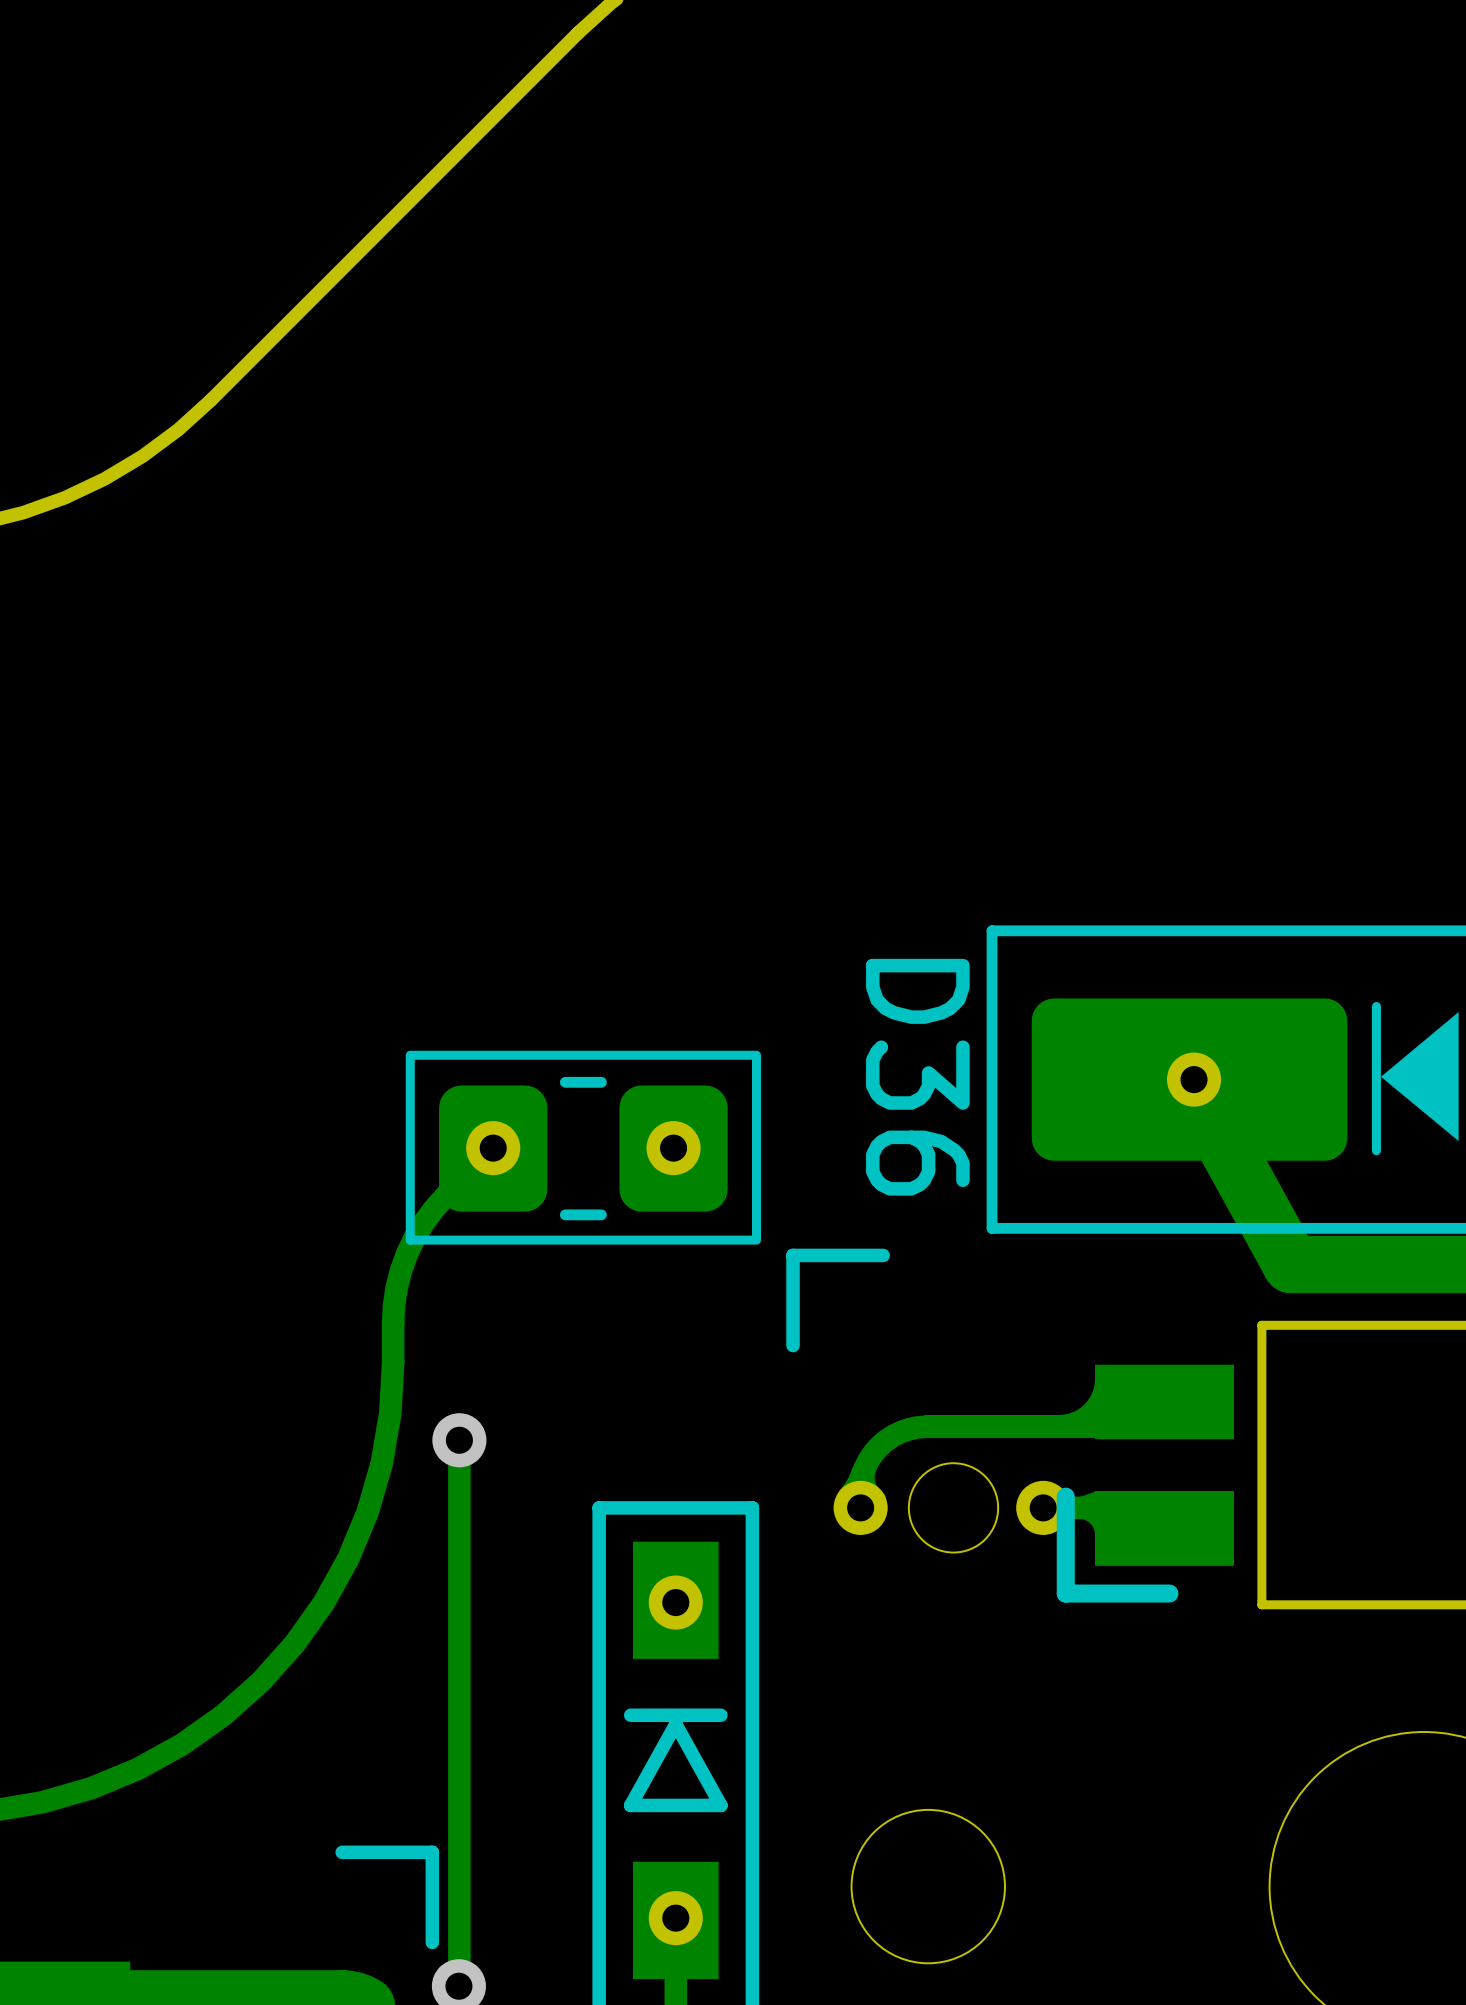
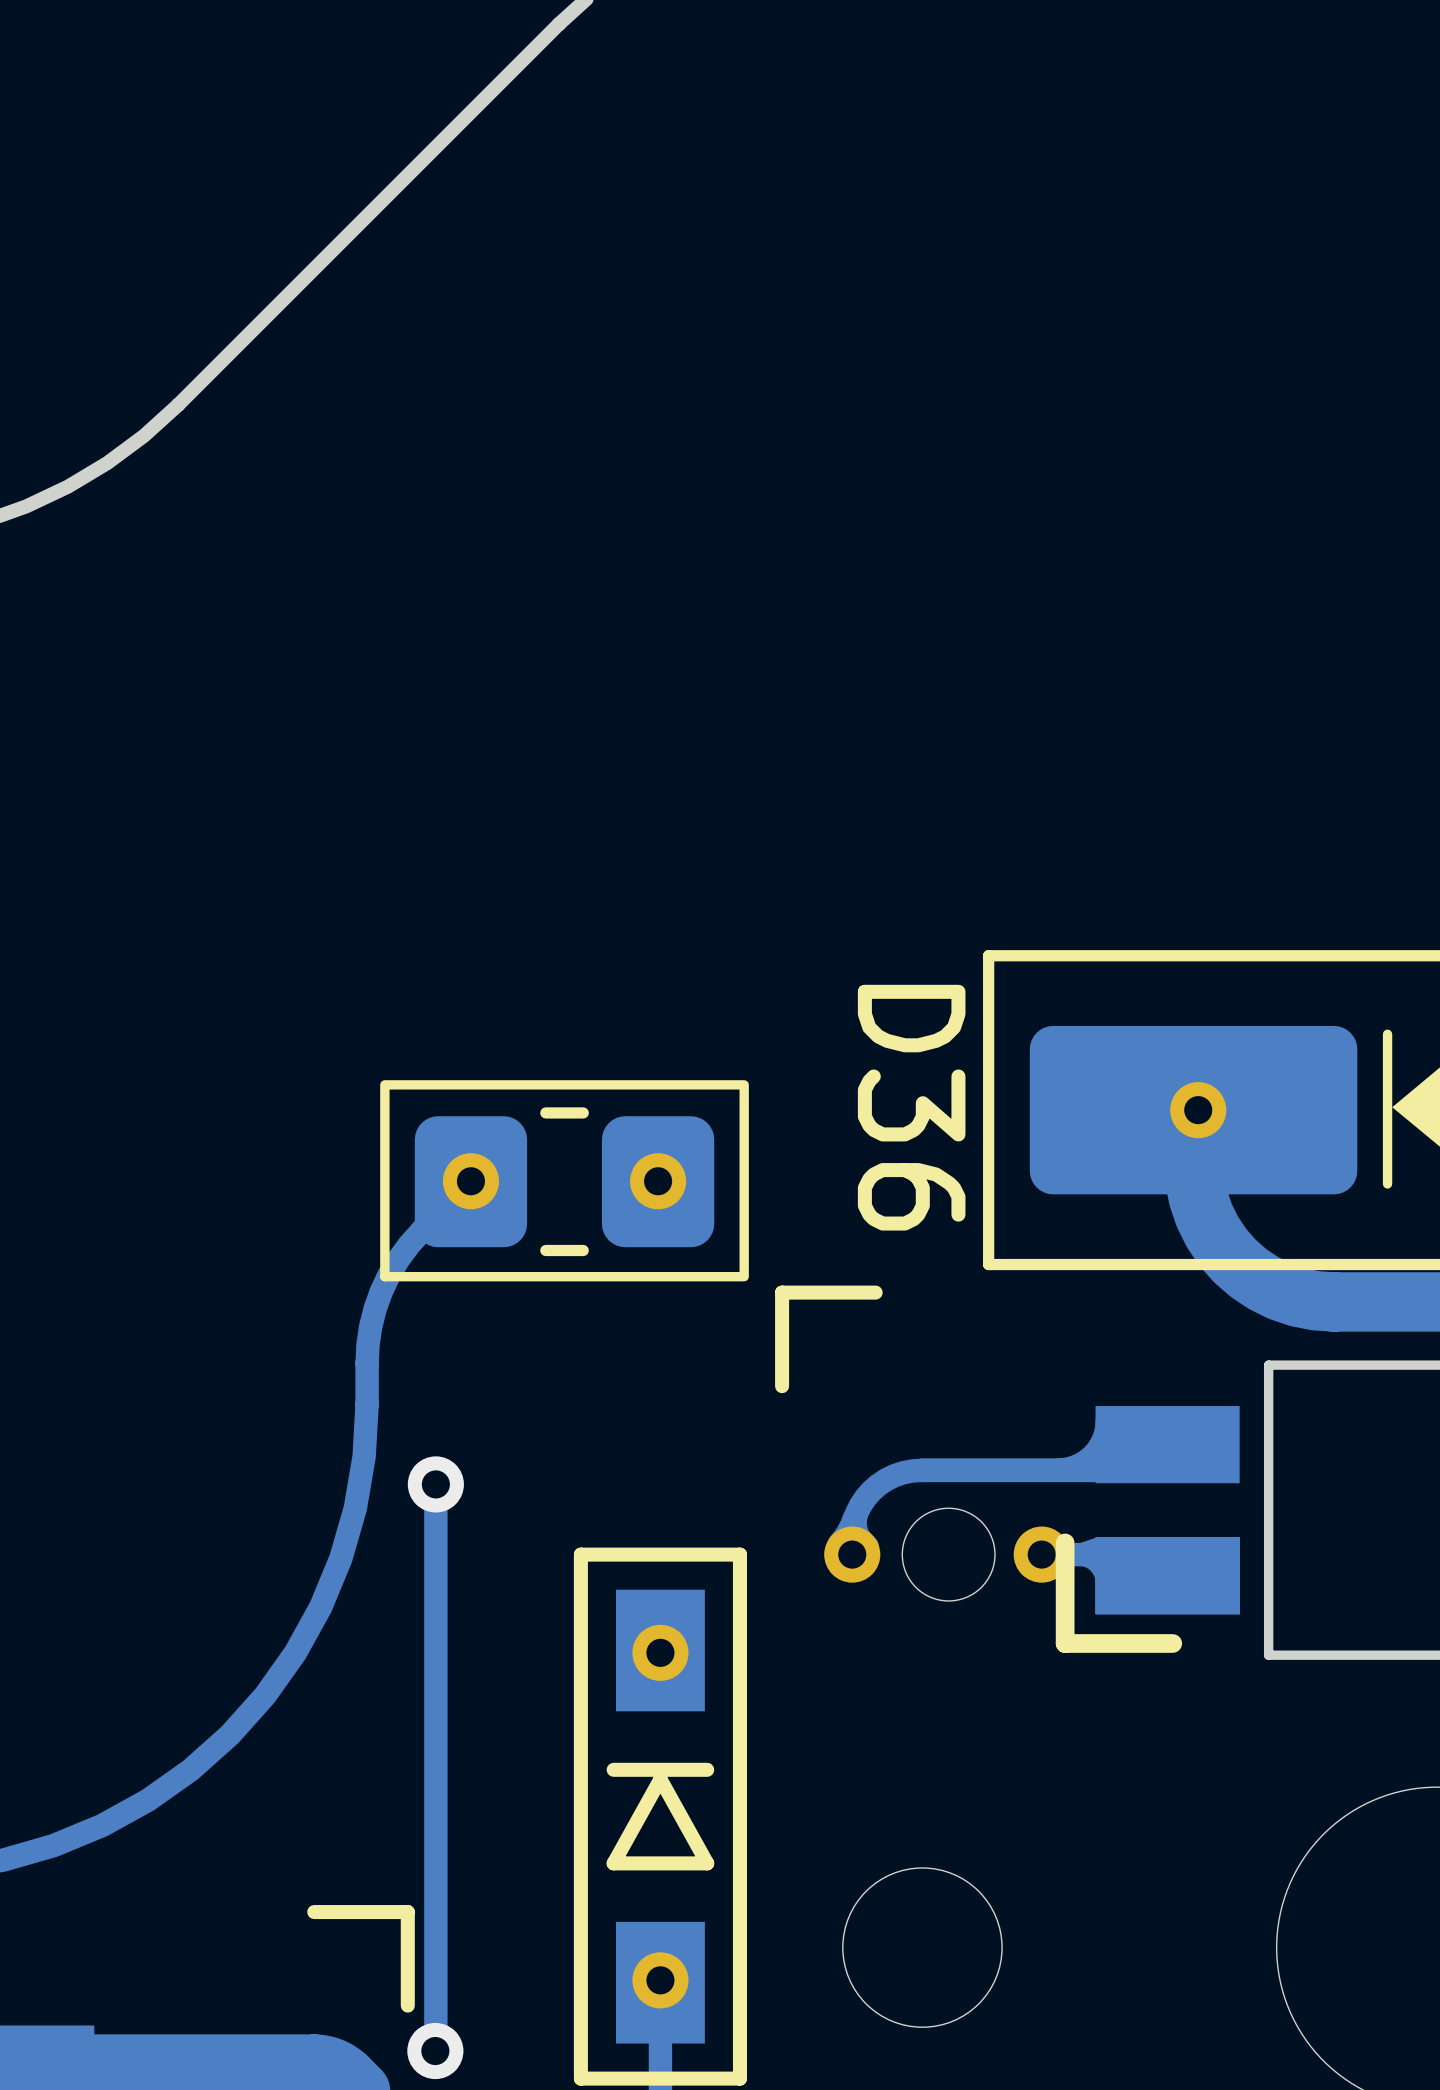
track: (1189, 1079) (1291, 1264) (1324, 1264) -> (1193, 1110) (1193, 1161) (1198, 1197) (1212, 1231) (1222, 1247) (1248, 1272) (1263, 1283) (1297, 1297) (1333, 1301)

